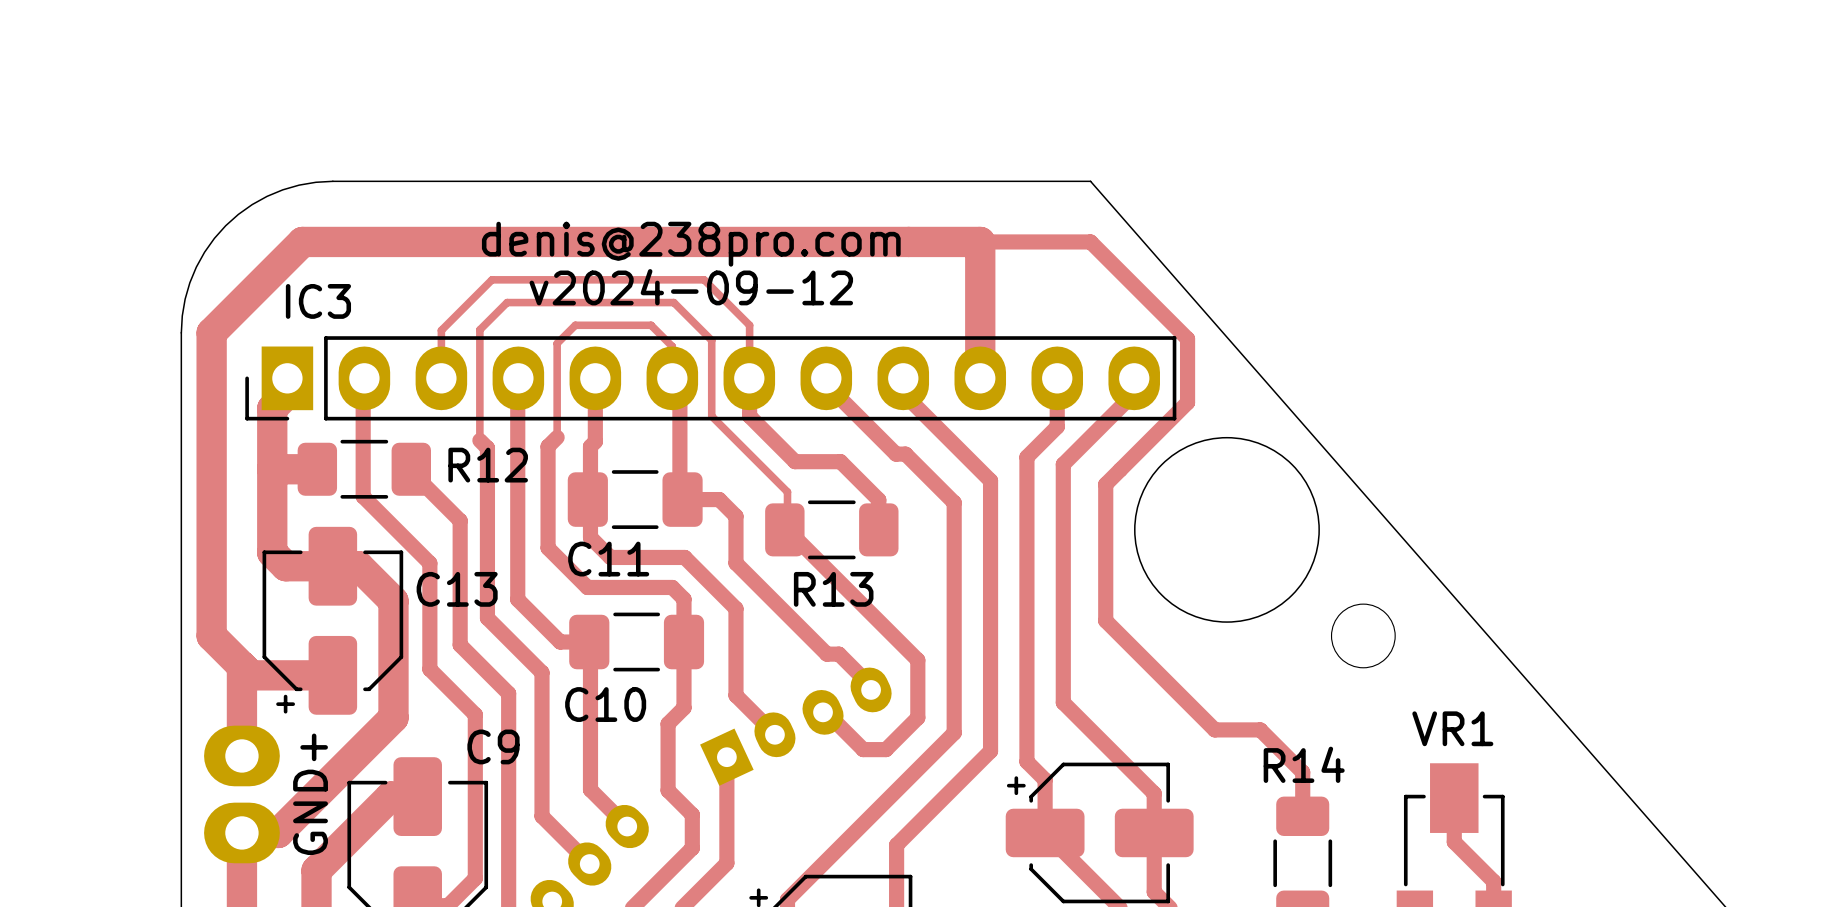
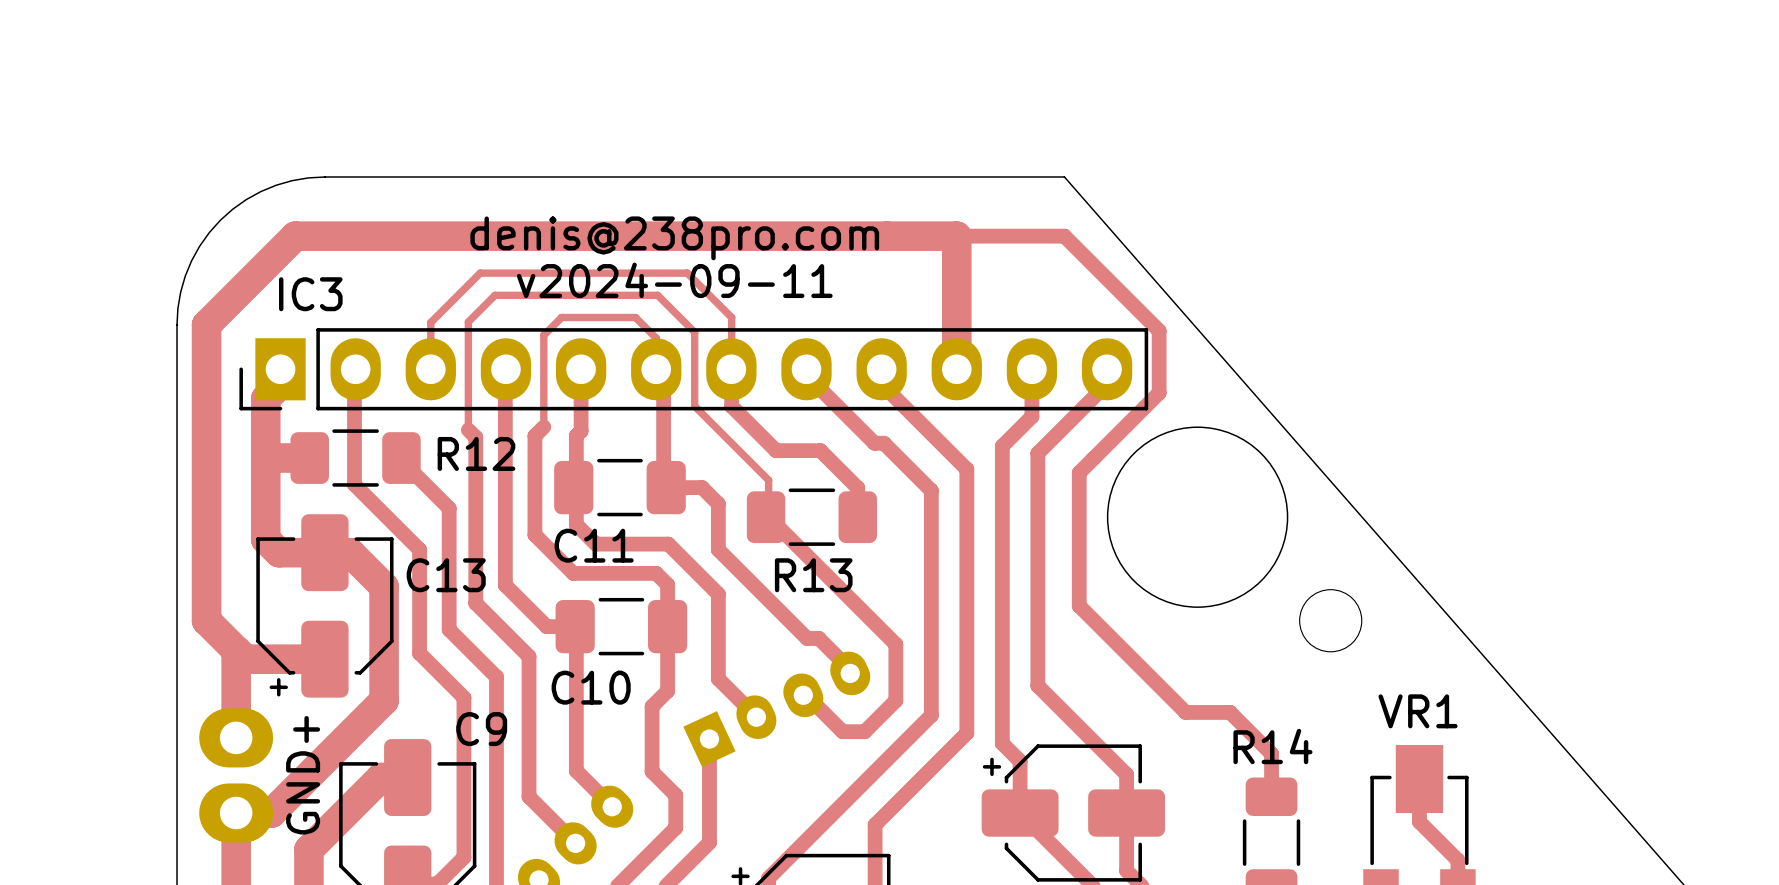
text: v2024-09-12 (691, 287) -> v2024-09-11 (674, 280)

